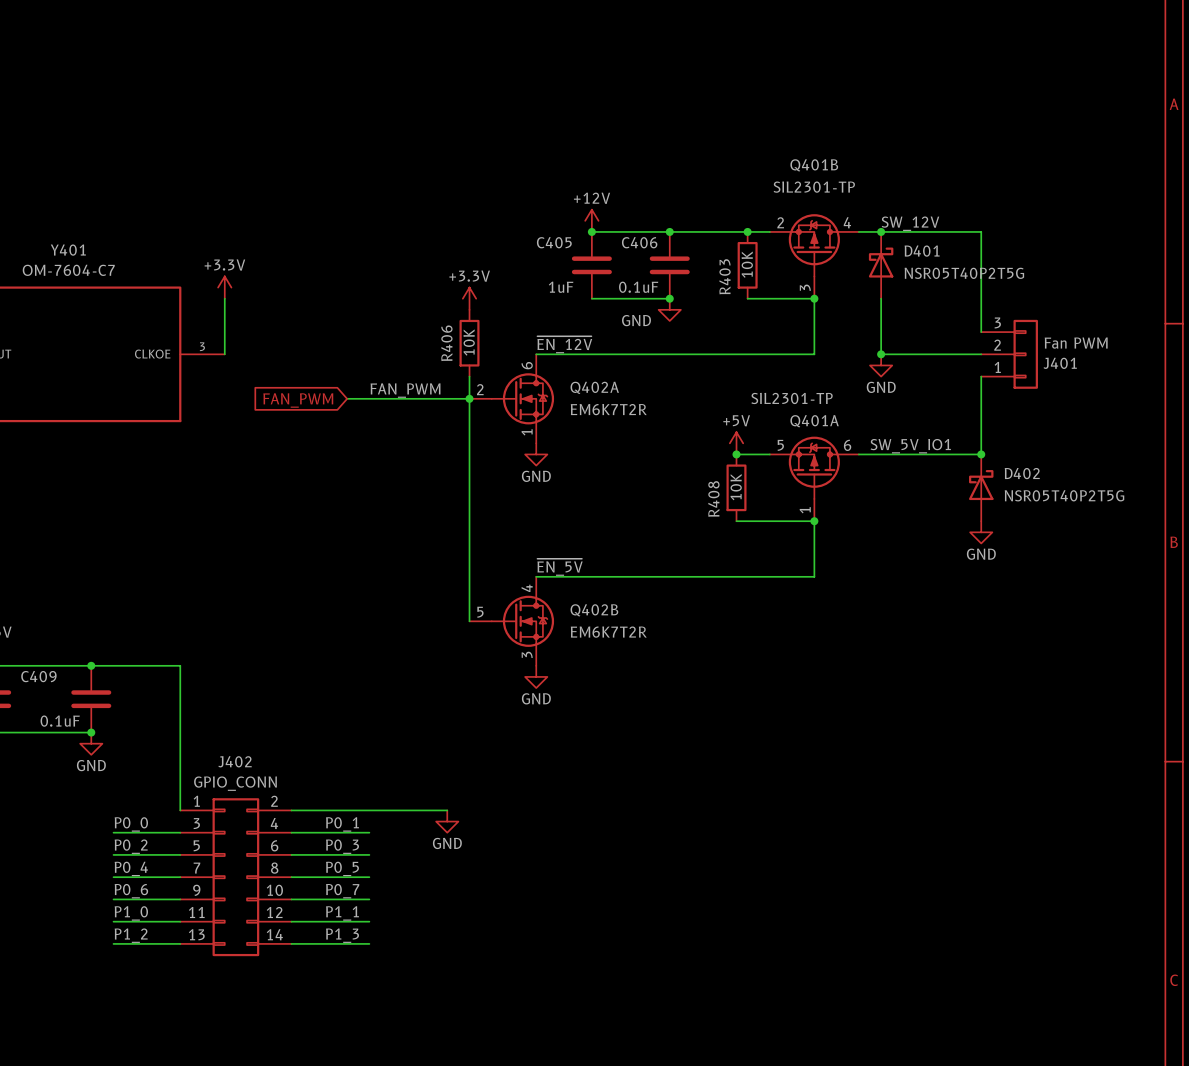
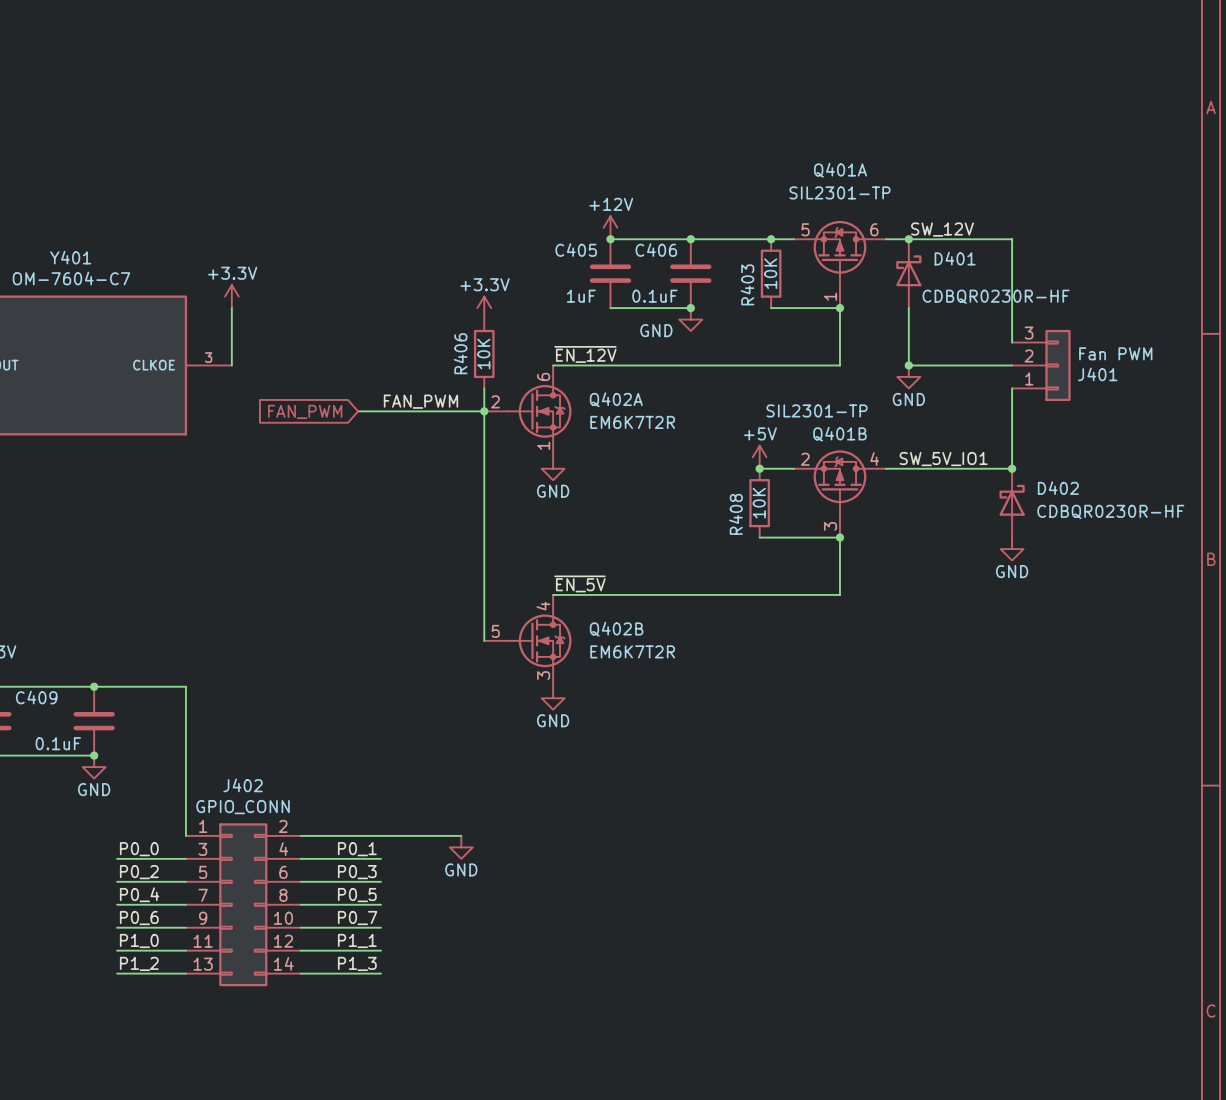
Q401B name position: Q401B (814, 165) -> Q401B (839, 434)
Q401B position: (814, 256) -> (839, 493)
D401 value: NSR05T40P2T5G (964, 273) -> CDBQR0230R-HF (996, 296)
Q401A name position: Q401A (814, 421) -> Q401A (840, 170)
Q401A position: (814, 478) -> (839, 264)
D402 value: NSR05T40P2T5G (1064, 495) -> CDBQR0230R-HF (1110, 511)

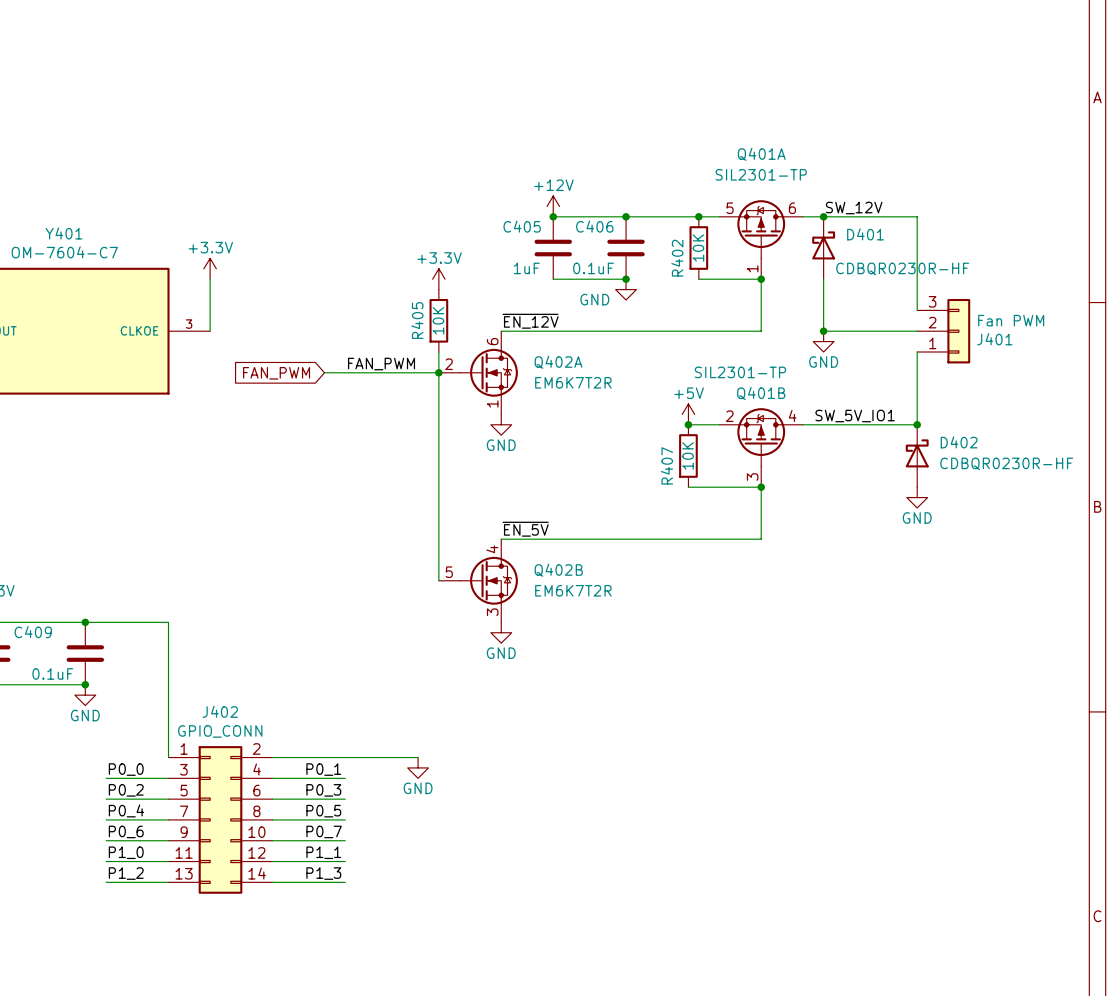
R403 name: R403 (747, 284) -> R402 (677, 258)
R406 name: R406 (460, 353) -> R405 (417, 320)
R408 name: R408 (736, 514) -> R407 (667, 465)

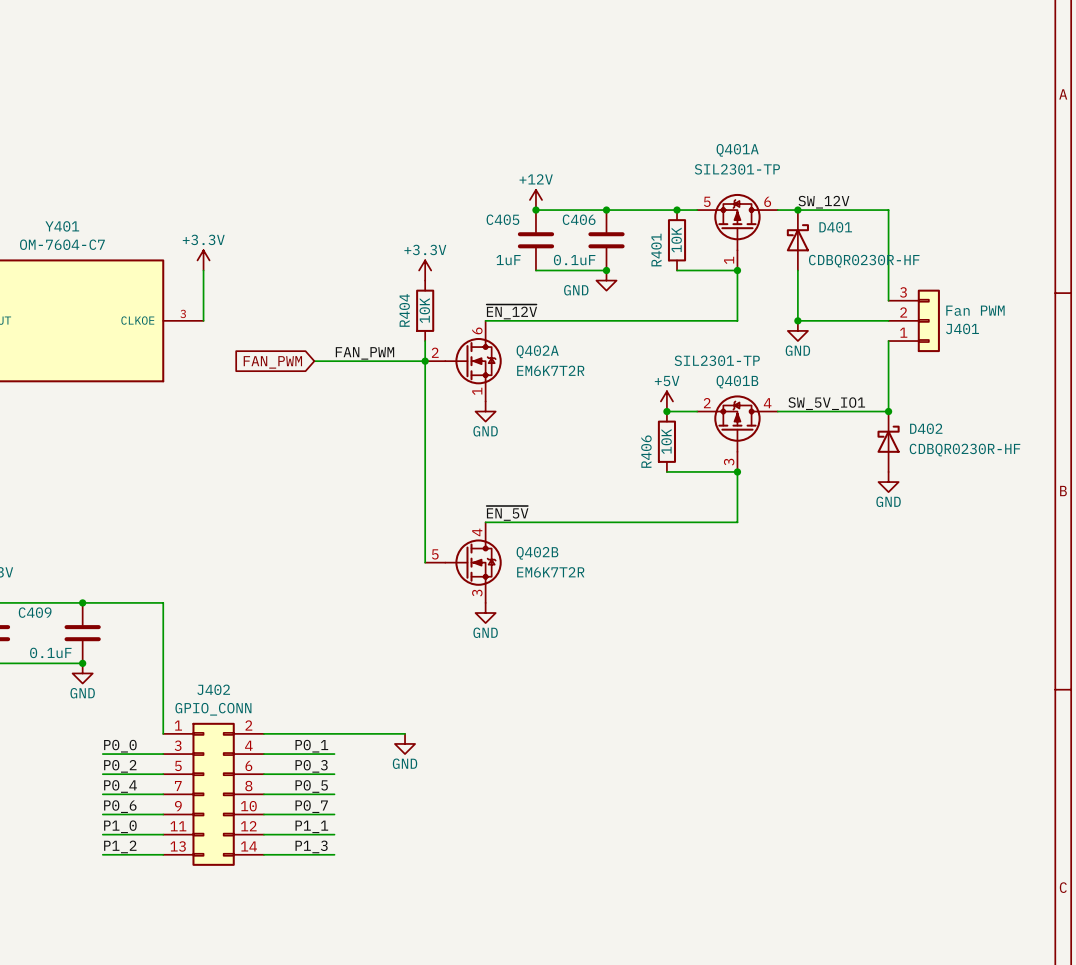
R402 name: R402 (677, 258) -> R401 (656, 250)
R405 name: R405 (417, 320) -> R404 (404, 310)
R407 name: R407 (667, 465) -> R406 (646, 451)

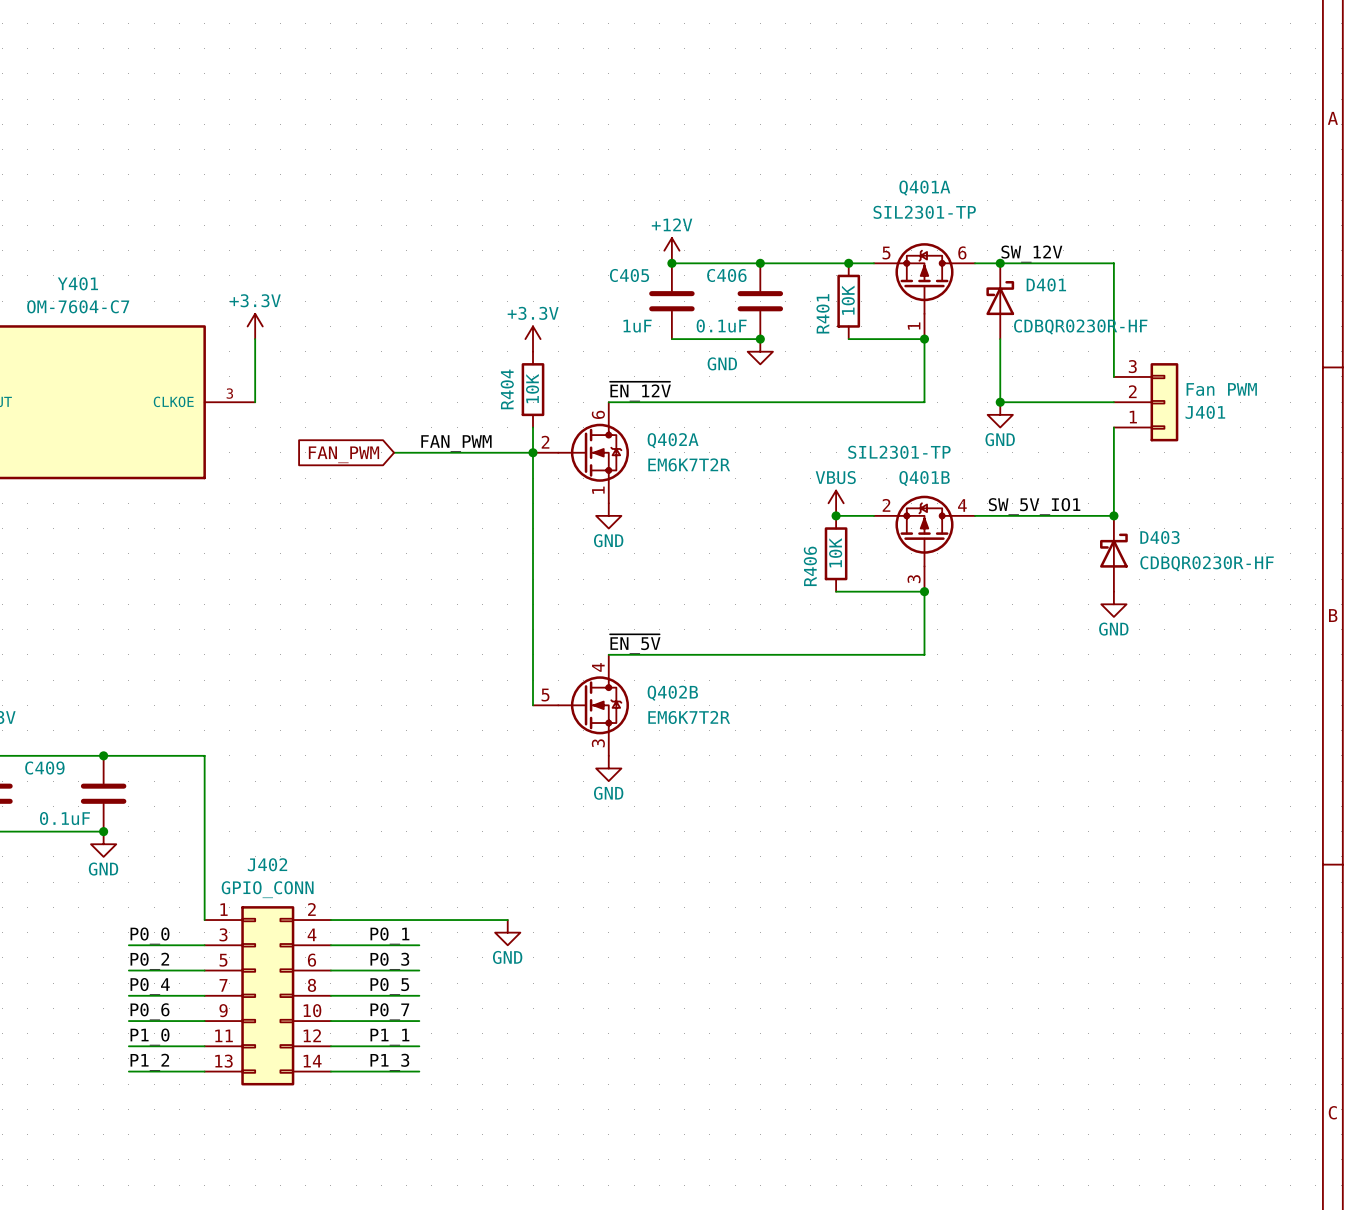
power symbol: +5V (666, 401) -> VBUS (836, 503)
D402 name: D402 (926, 428) -> D403 (1159, 537)

